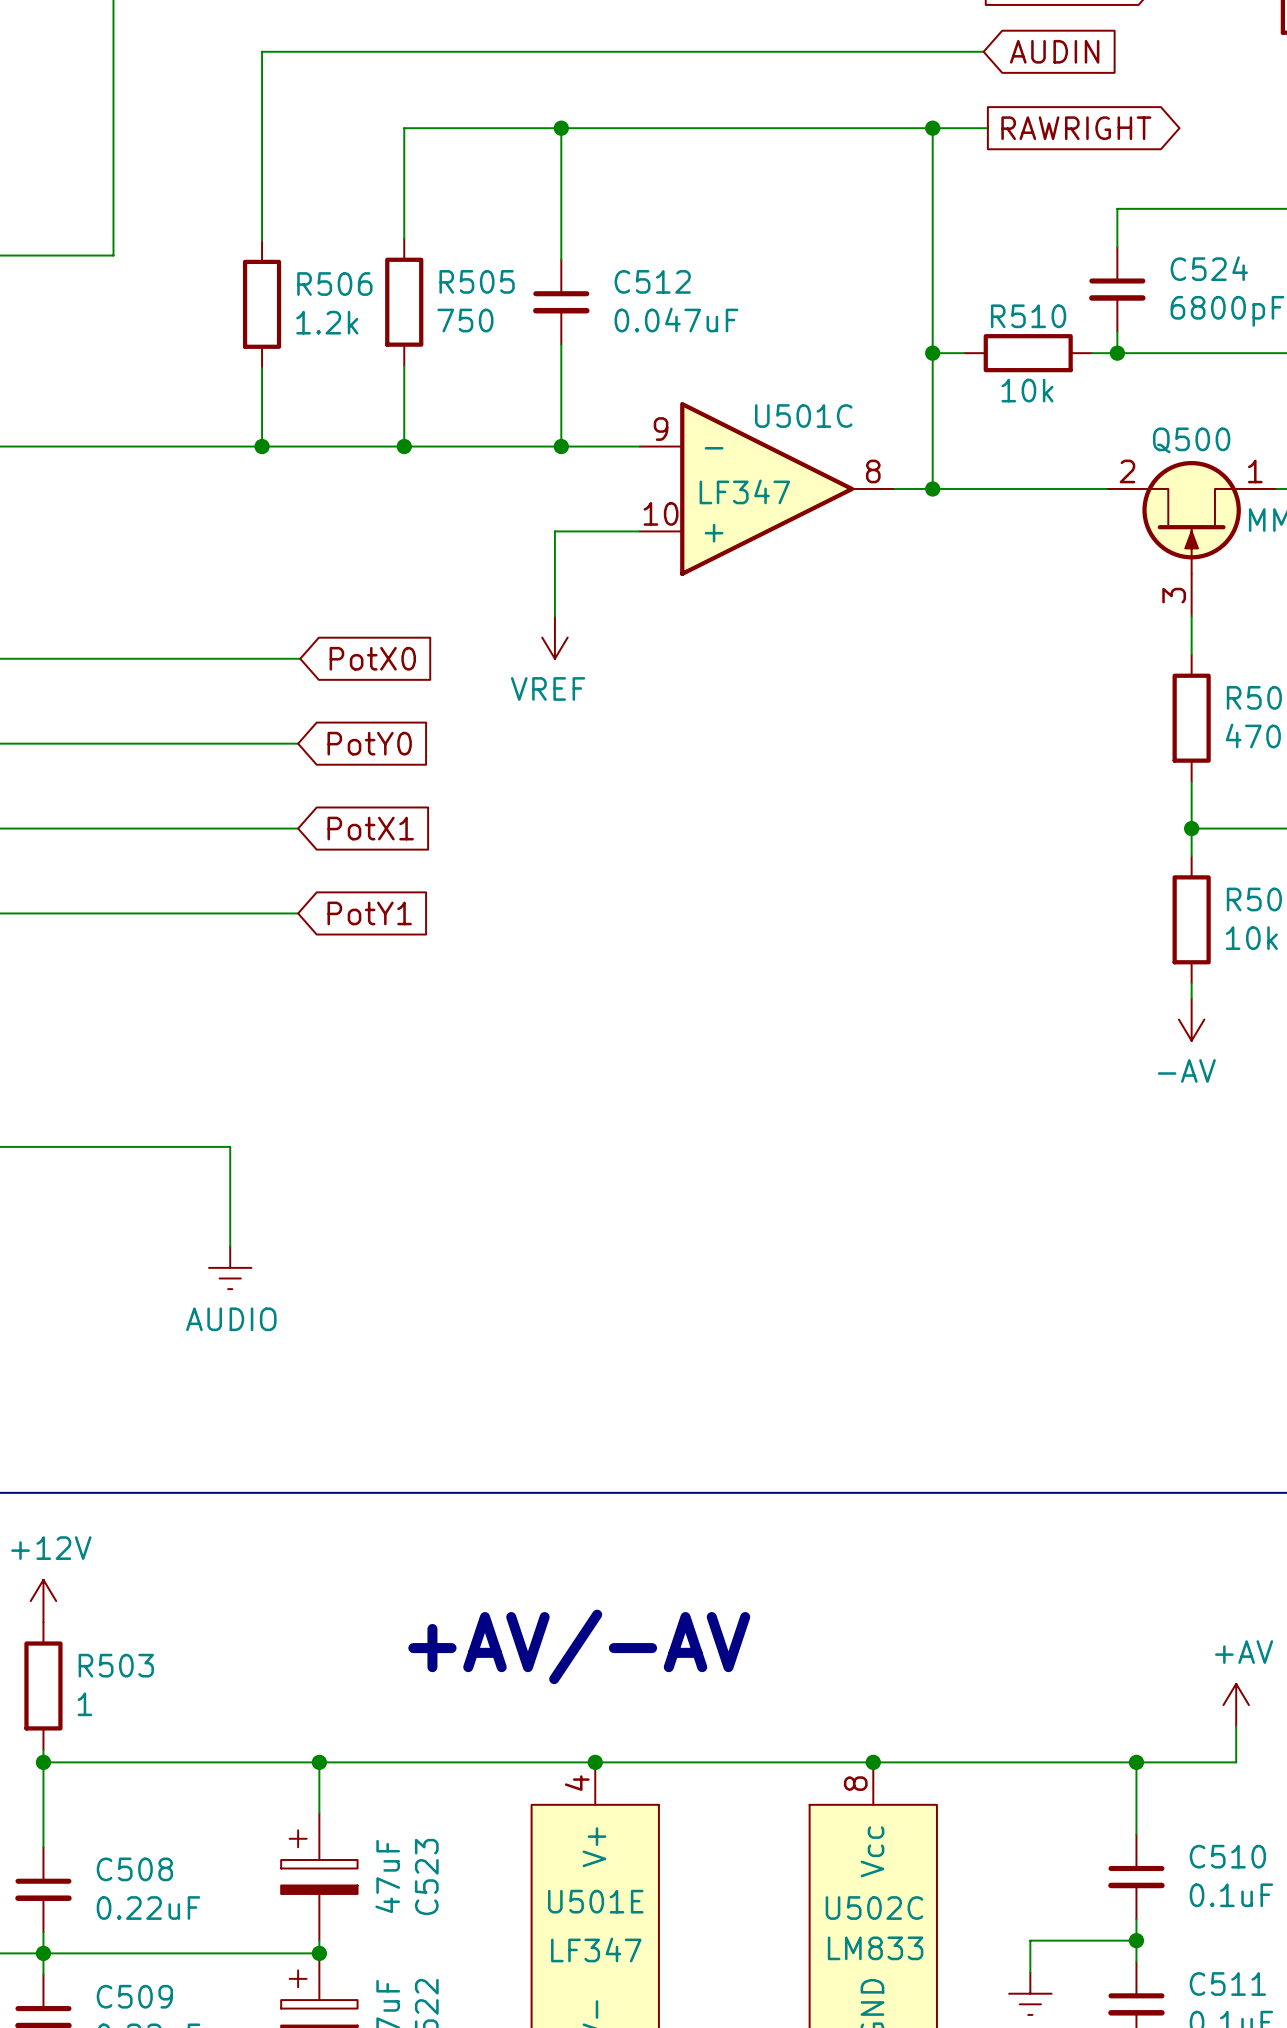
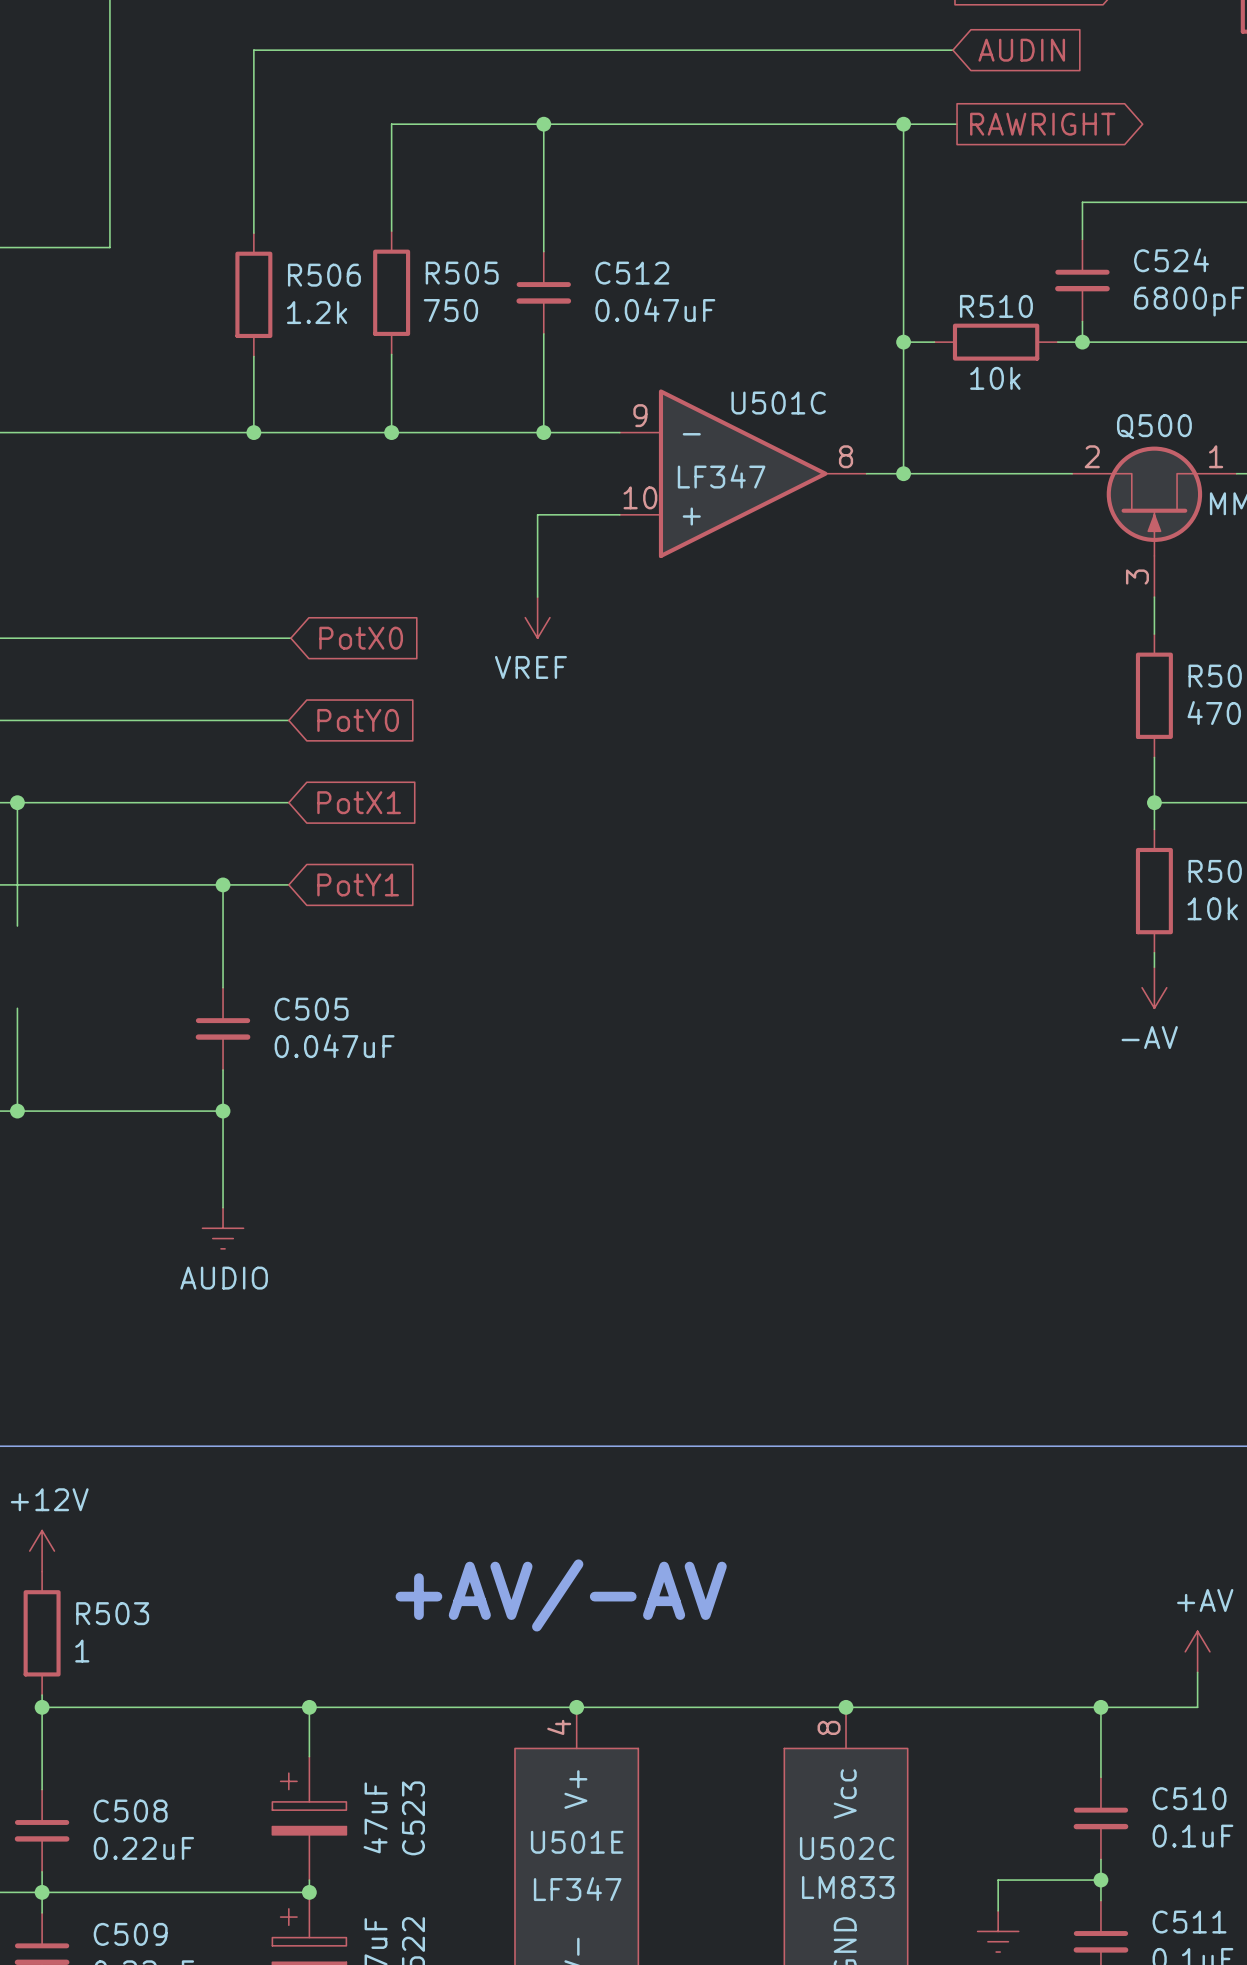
wire: none -> (17, 802) (17, 926)
junction: none -> (17, 802)
wire: none -> (223, 884) (223, 987)
junction: none -> (223, 884)
wire: none -> (17, 1008) (17, 1111)
C505: none -> 0.047uF (223, 1028)
wire: none -> (223, 1069) (223, 1111)
junction: none -> (17, 1111)
junction: none -> (223, 1111)

